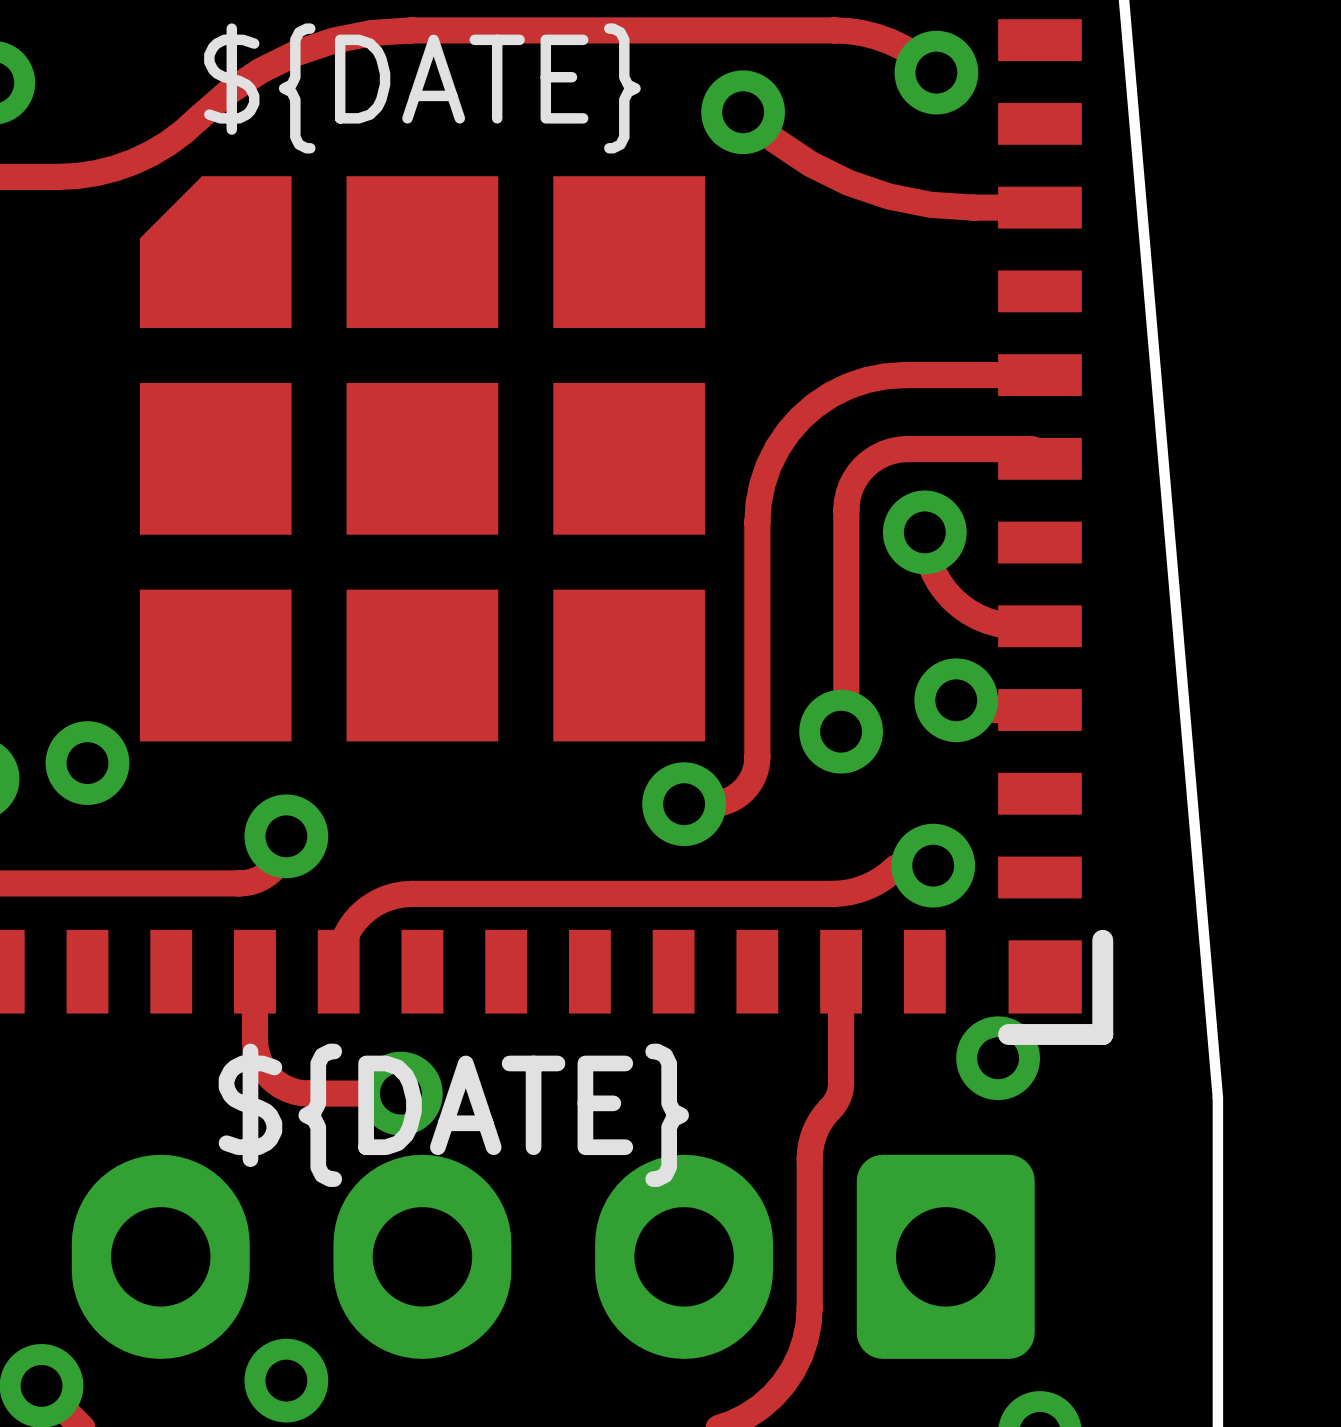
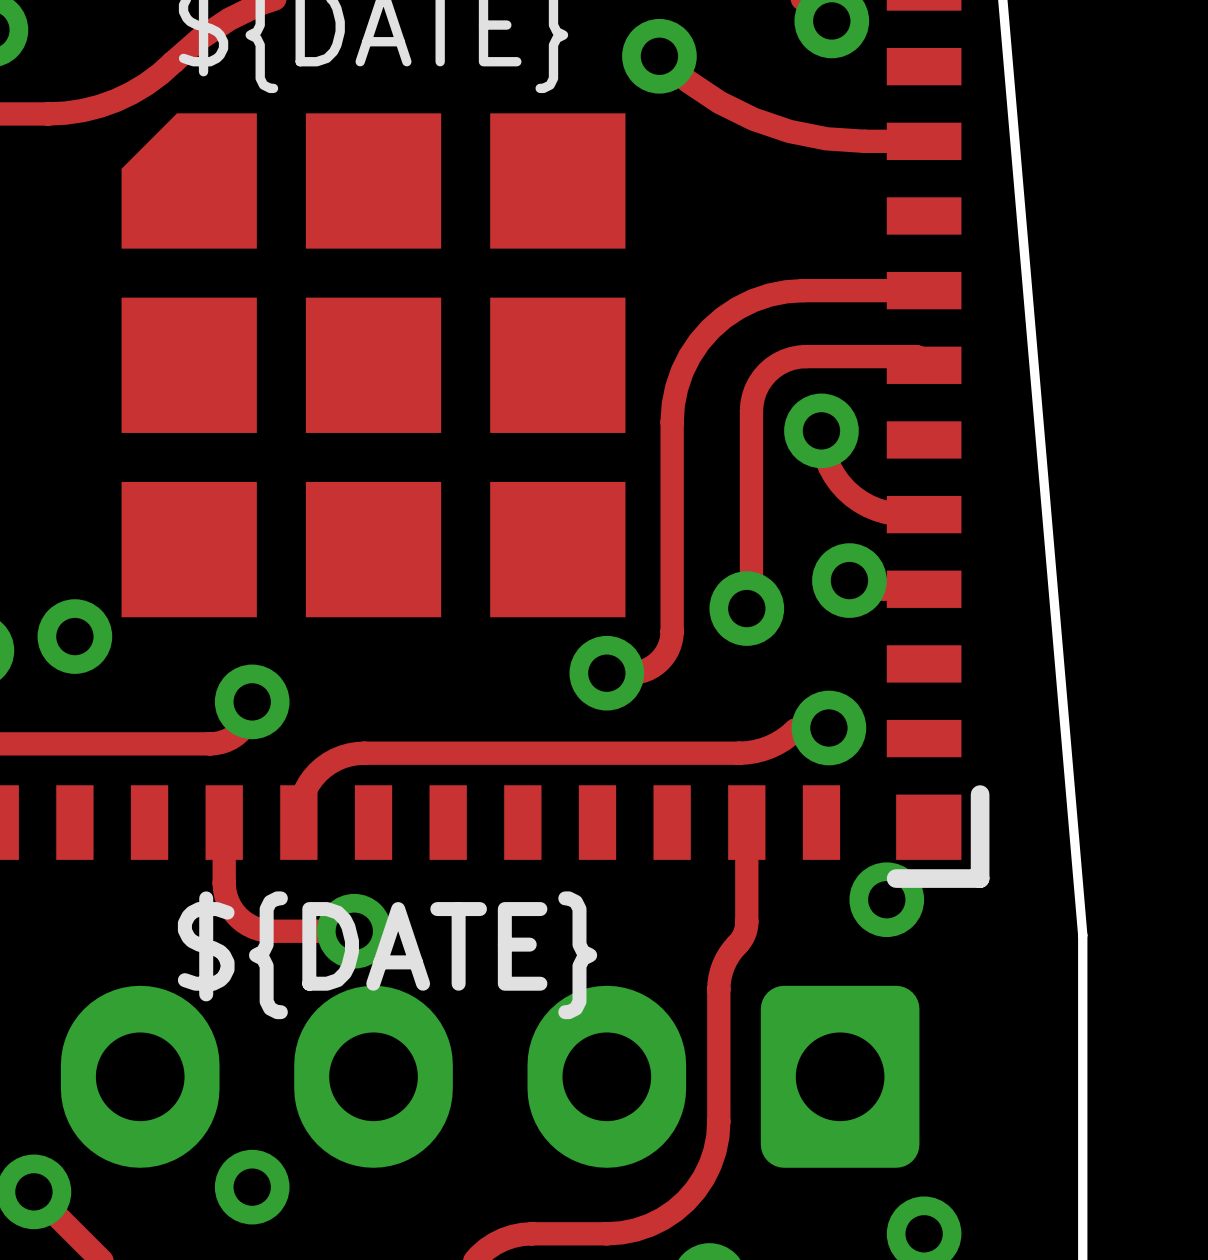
text position: ${DATE} (453, 1115) -> ${DATE} (387, 955)

